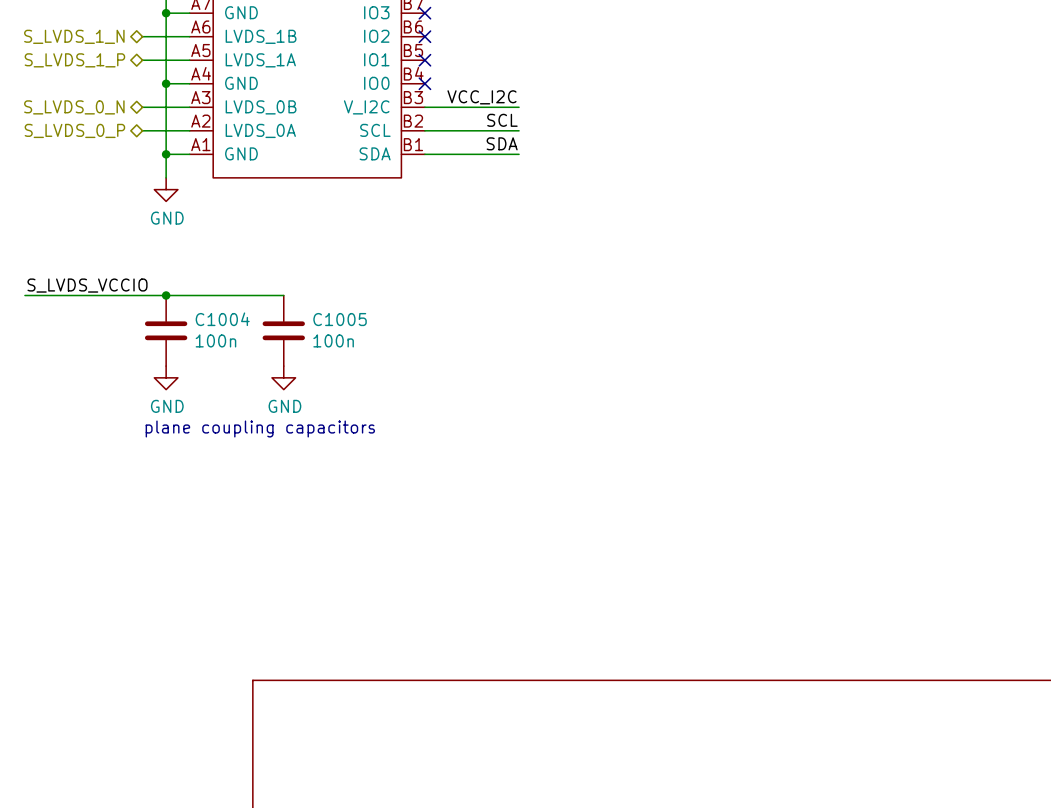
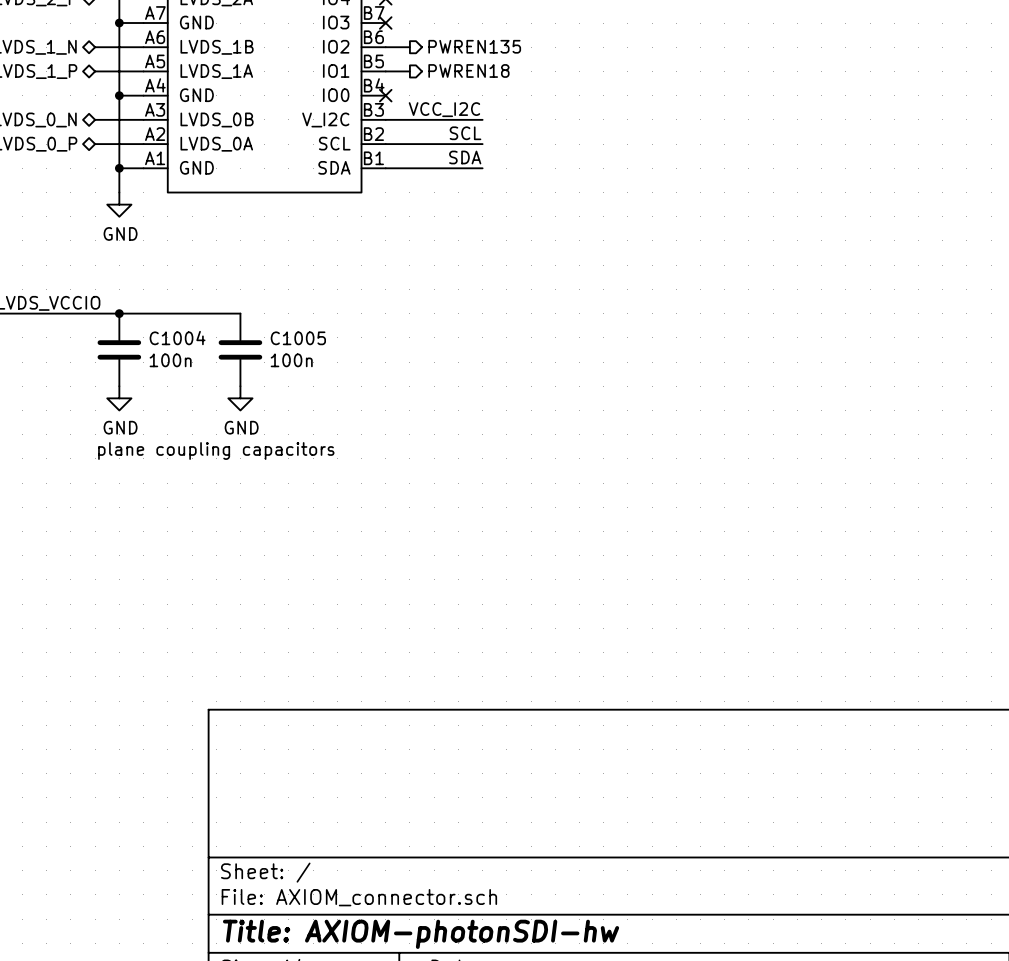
wire: none -> (385, 47) (409, 47)
no-connect mark: (424, 36) -> none
hierarchical label: none -> PWREN135 (474, 46)
hierarchical label: none -> PWREN18 (468, 70)
wire: none -> (385, 71) (409, 71)
no-connect mark: (424, 60) -> none

